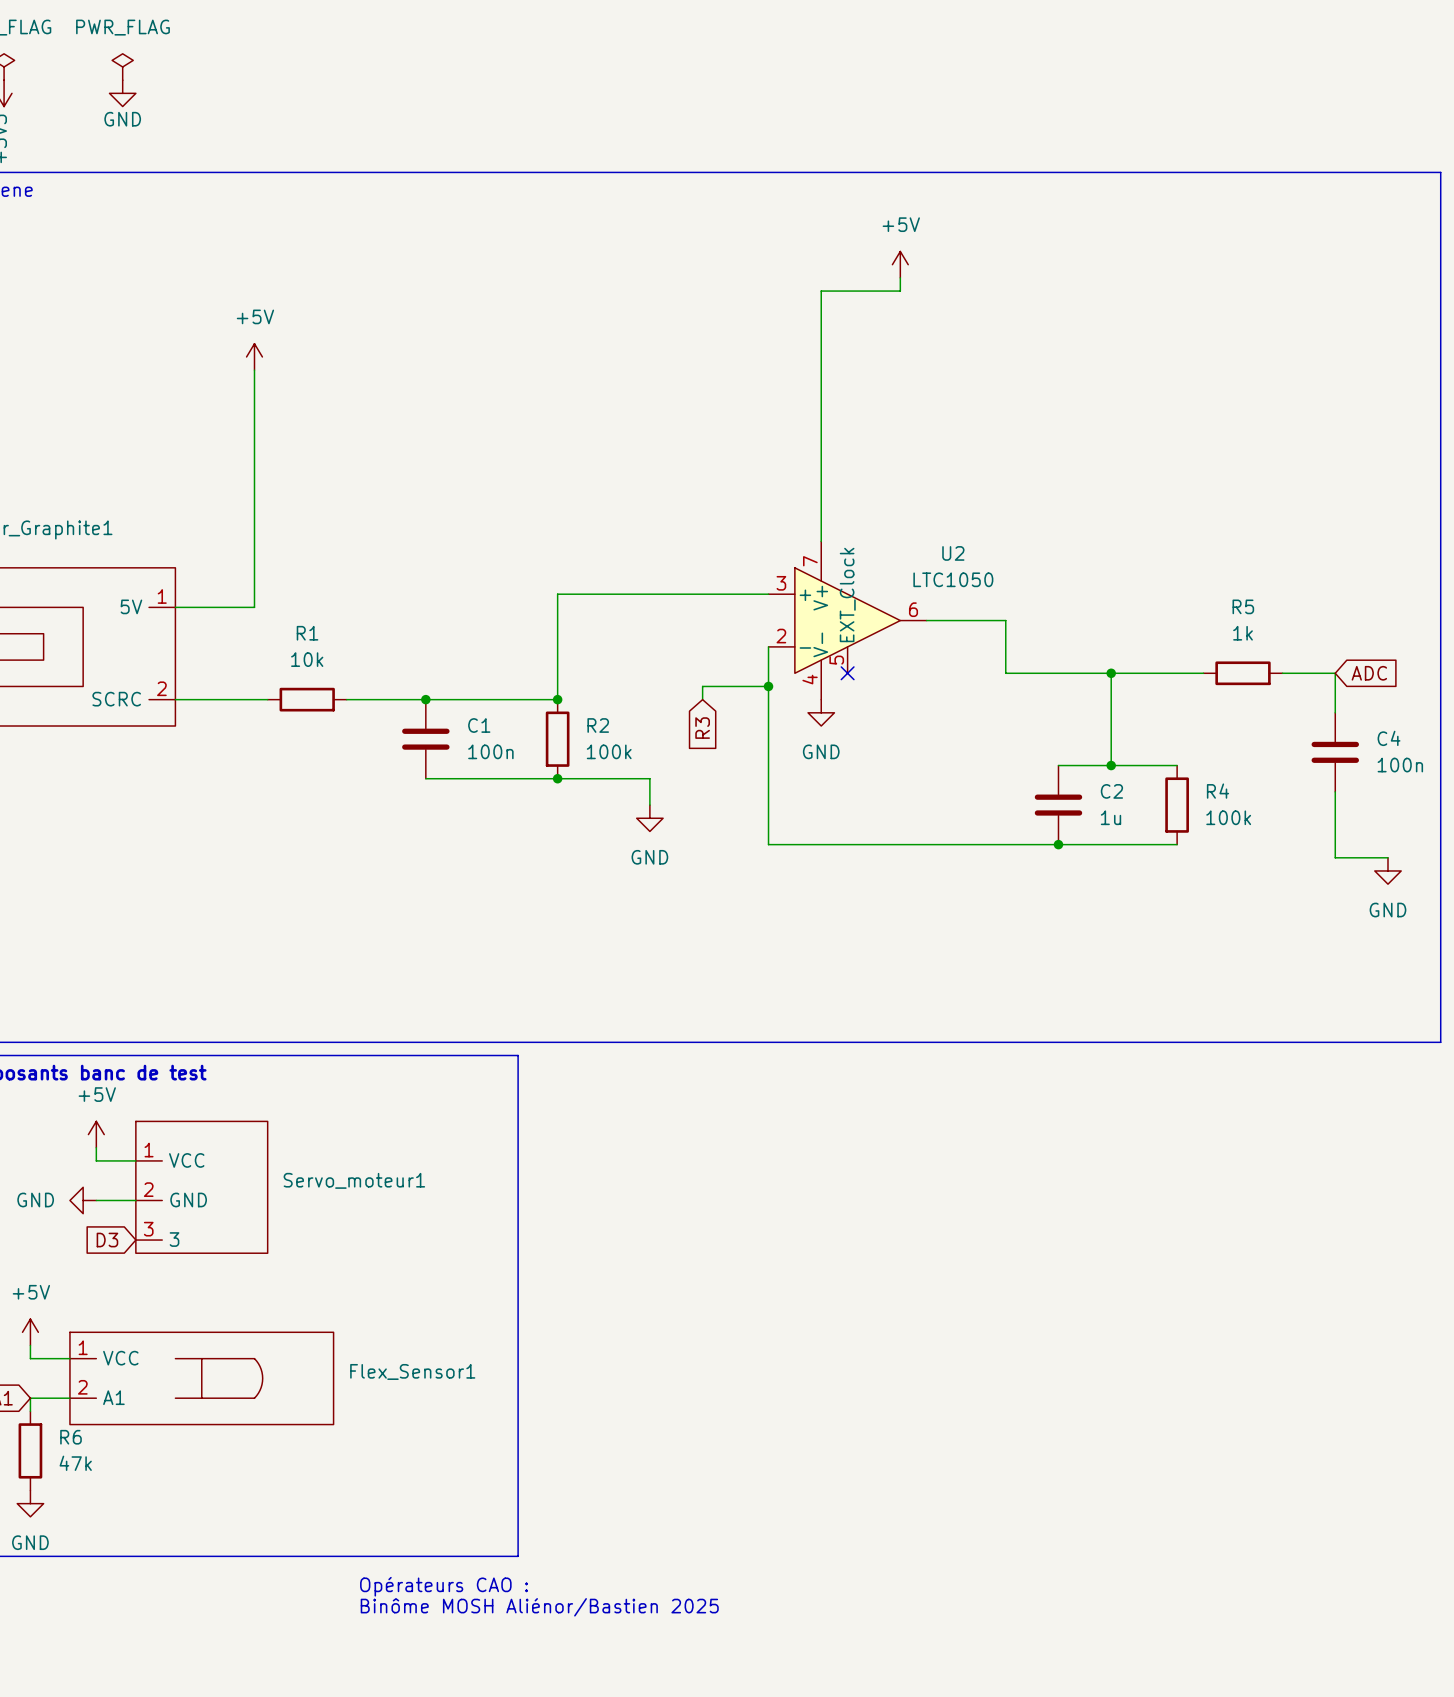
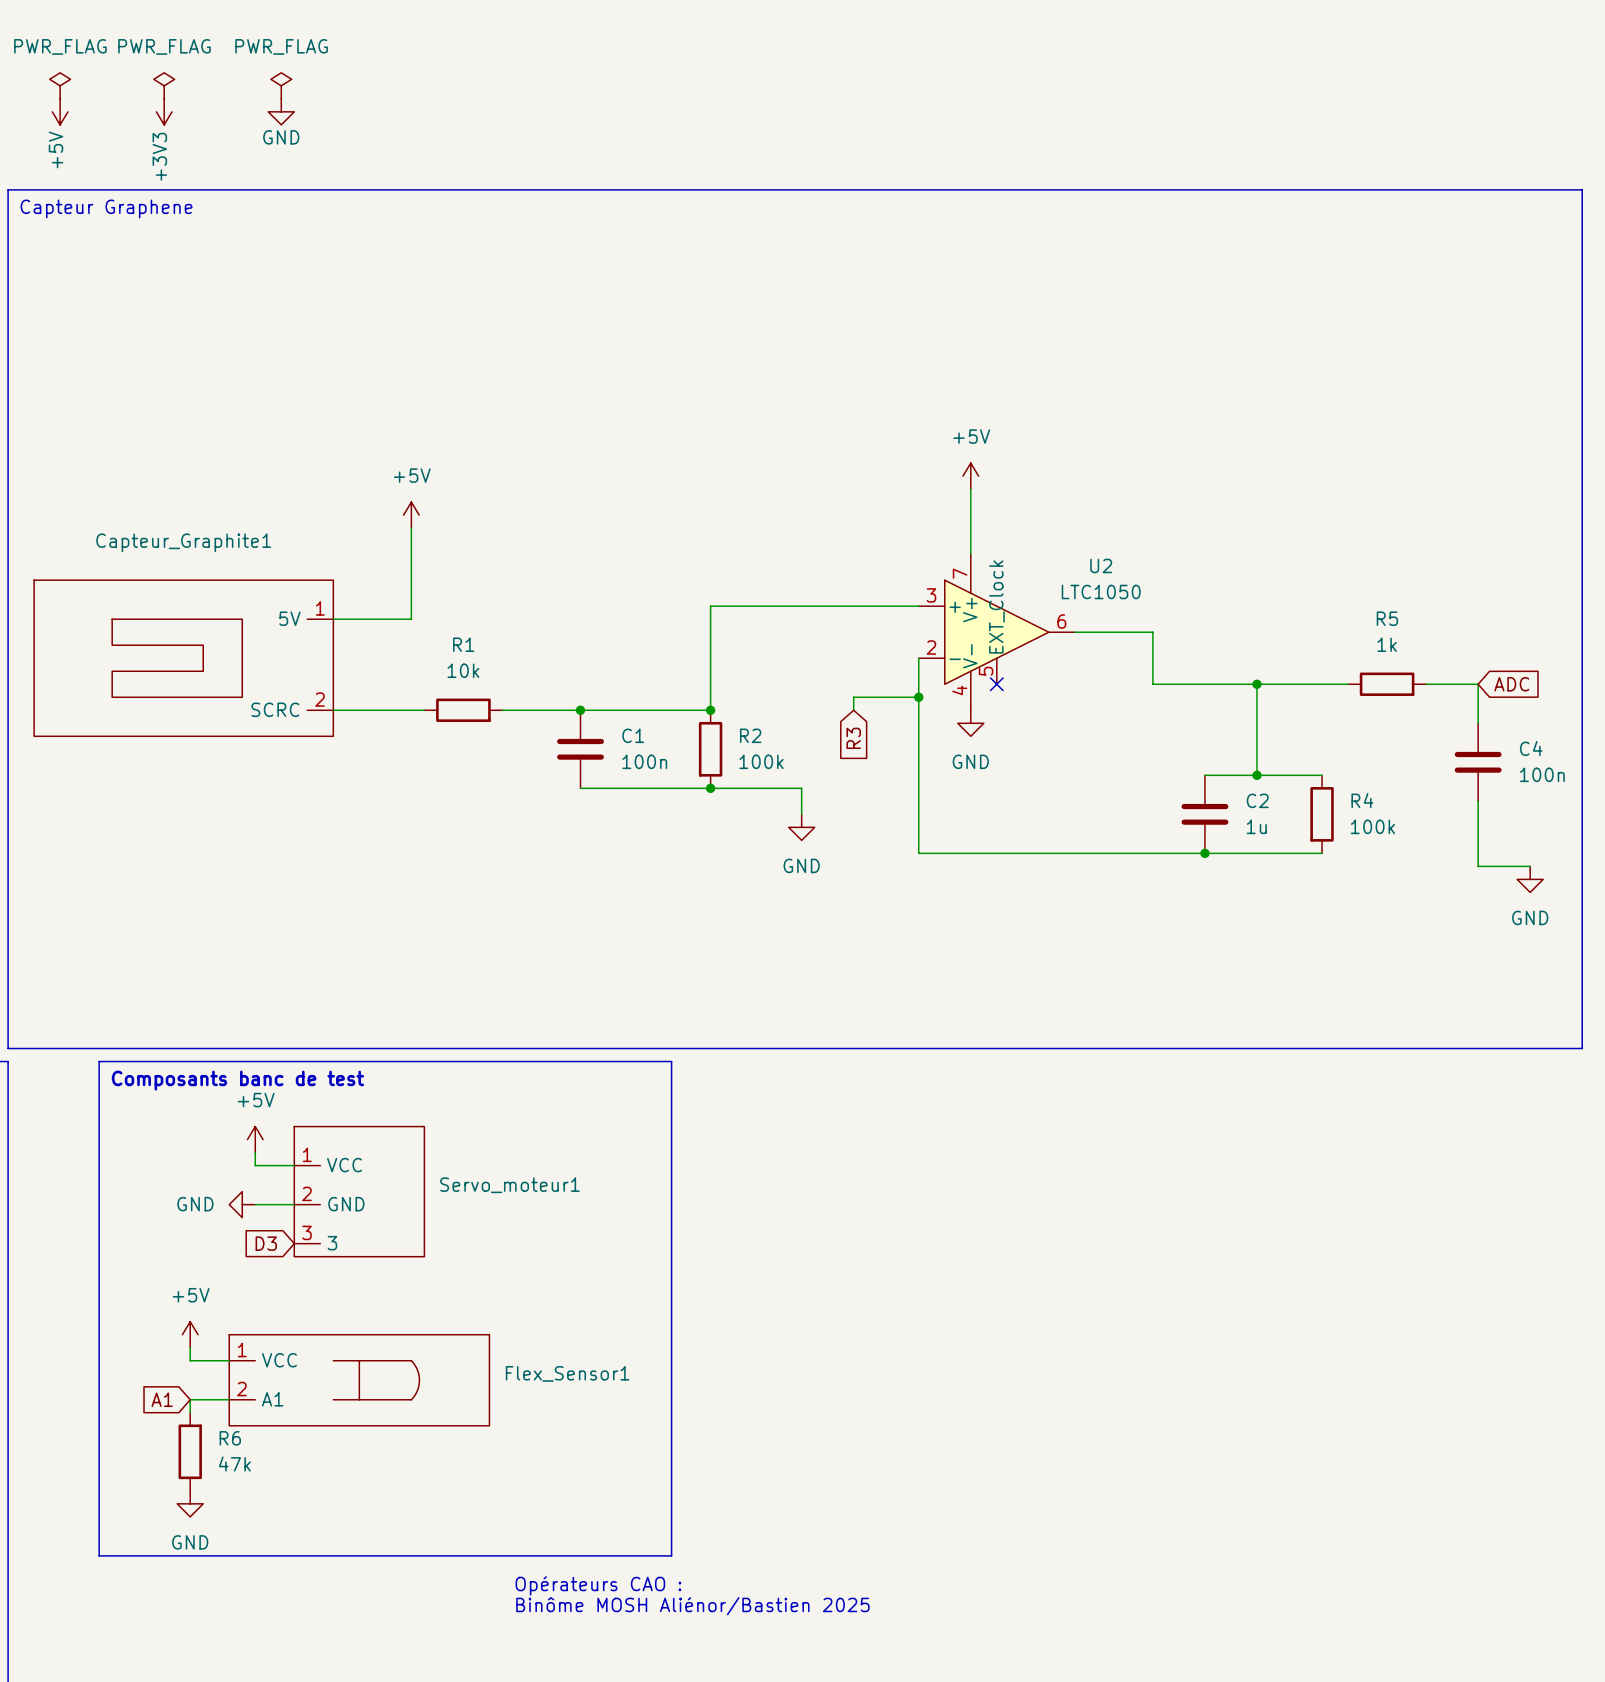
power symbol position: +5V (900, 264) -> +5V (970, 476)
wire: (900, 277) (900, 291) (821, 291) (821, 475) -> none
power symbol position: +5V (254, 356) -> +5V (411, 515)
wire: (254, 370) (254, 515) -> none

